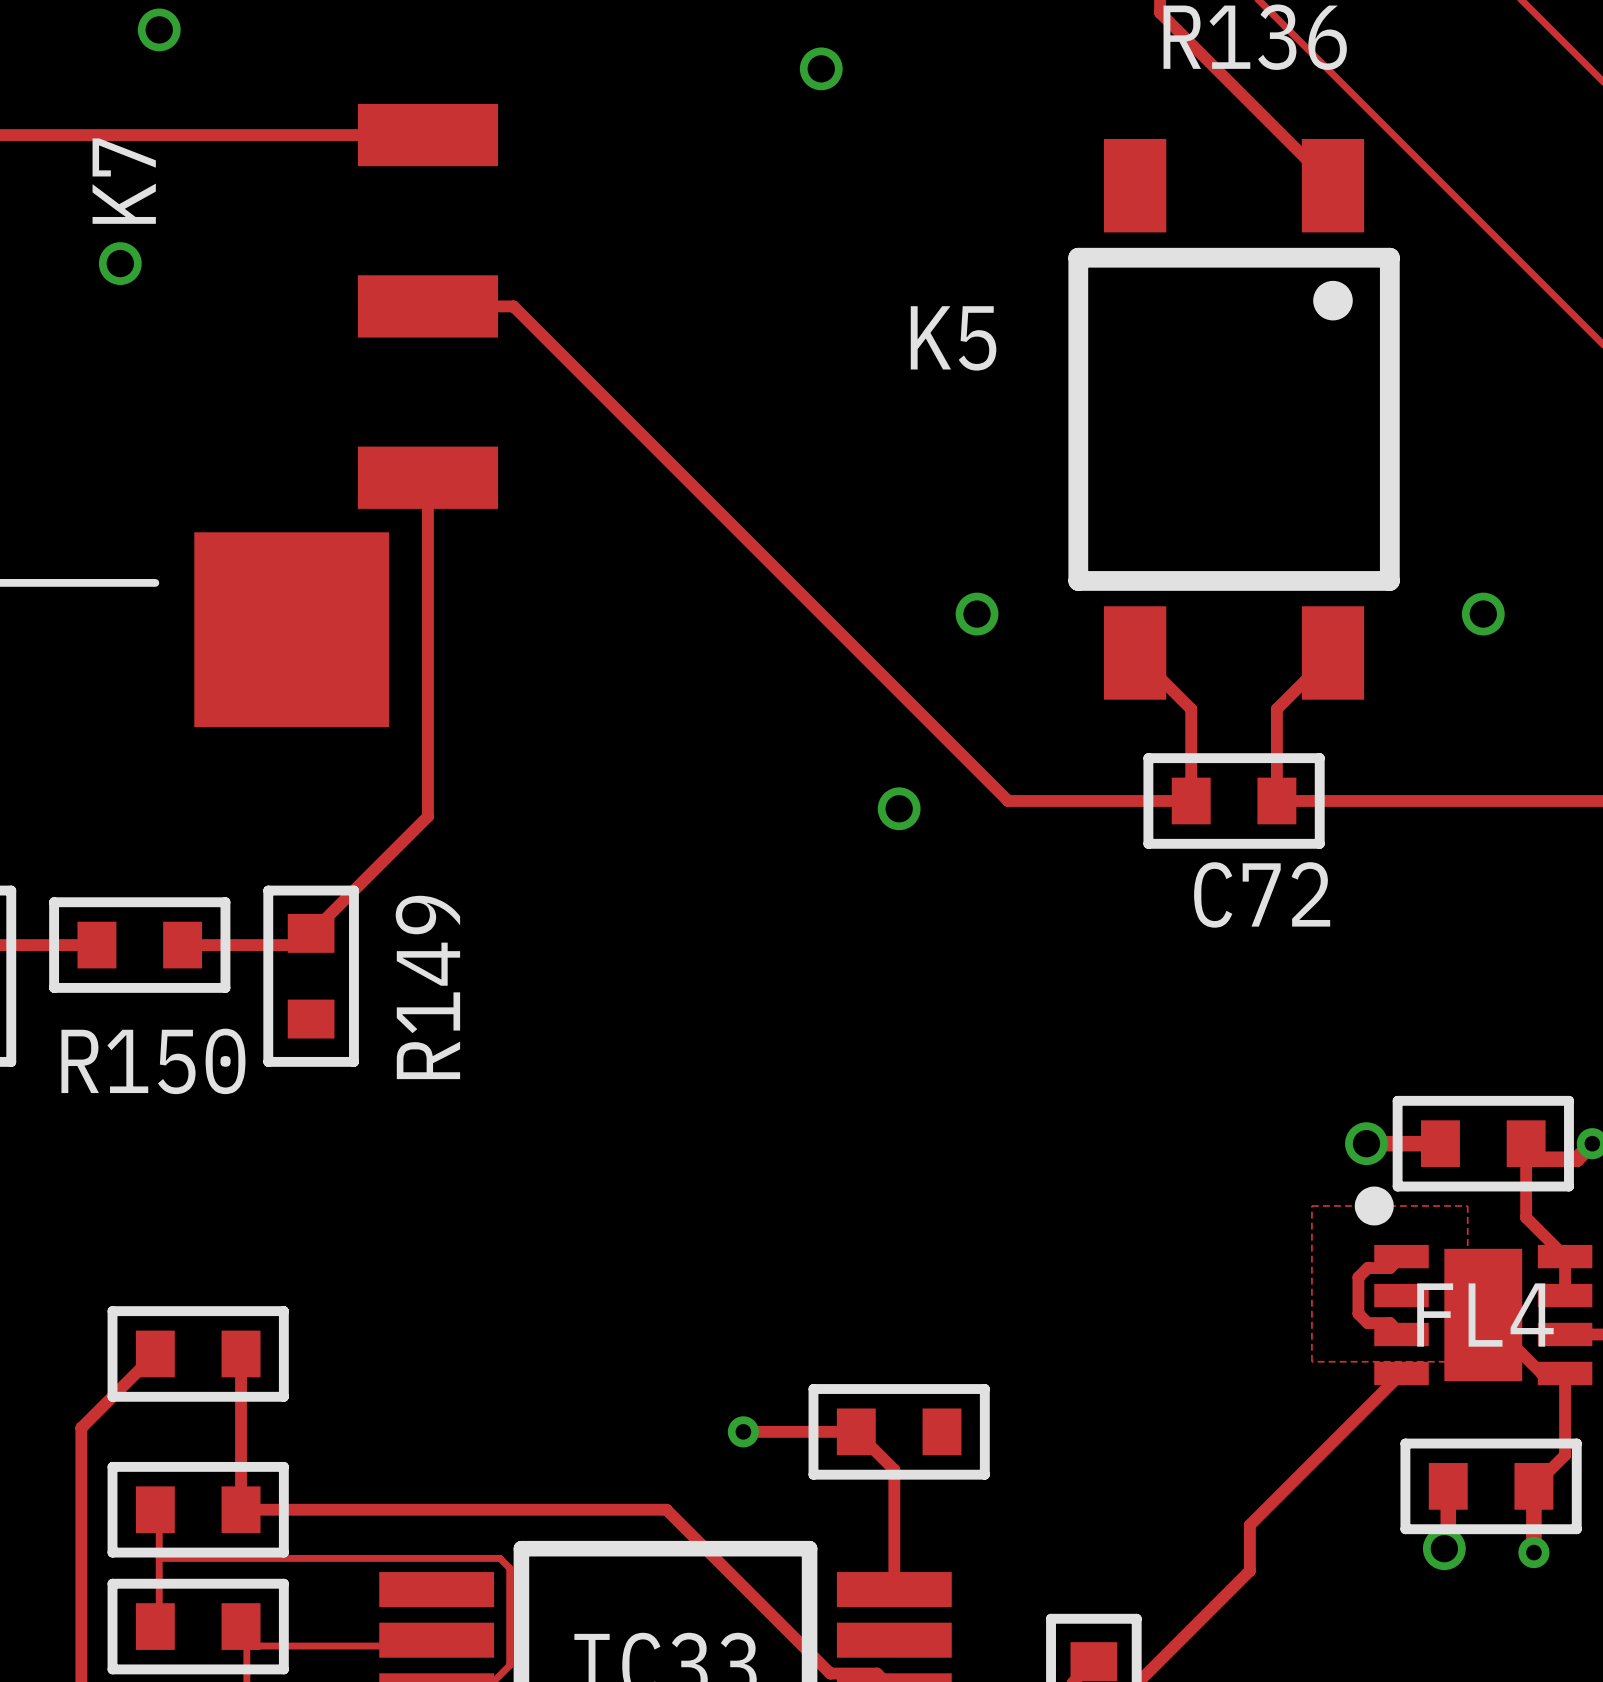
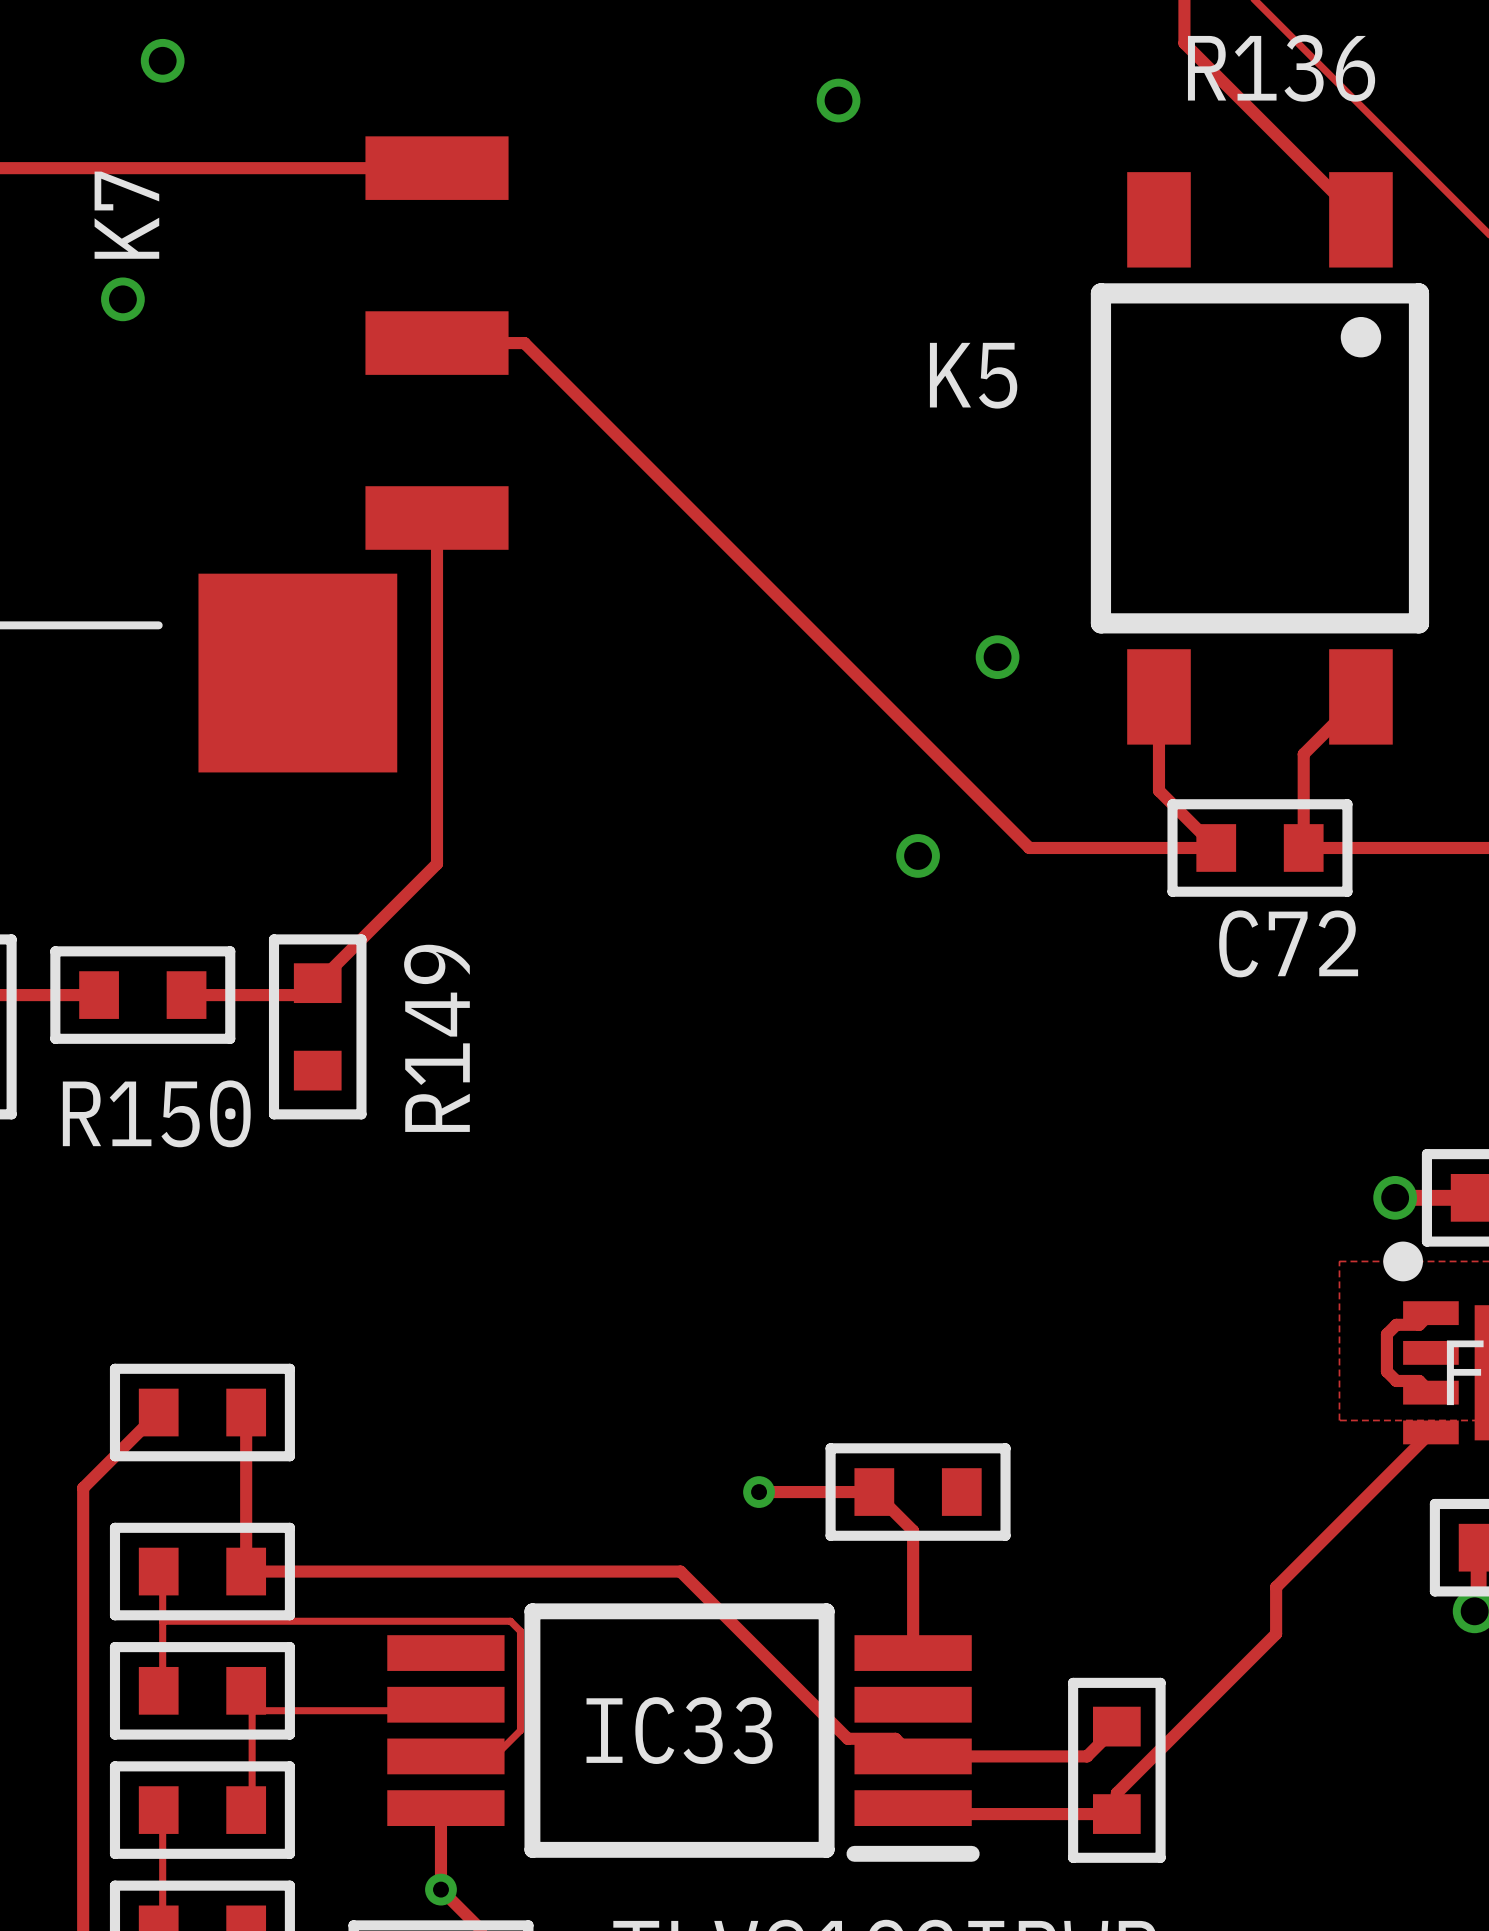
track: (1135, 653) (1191, 709) (1191, 800) -> (1158, 696) (1158, 790) (1216, 847)

